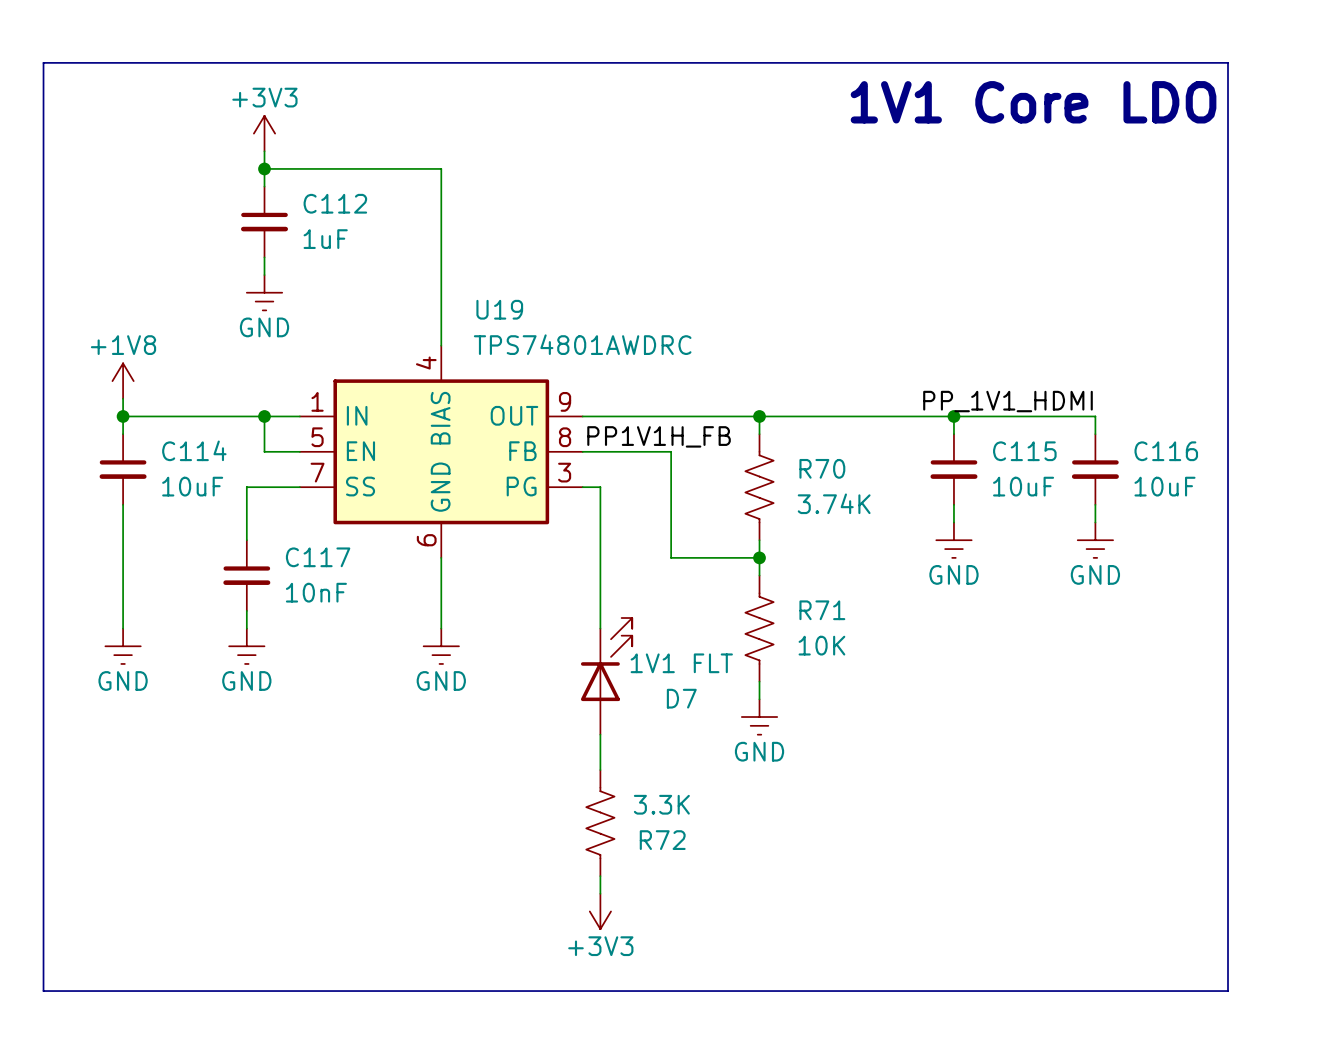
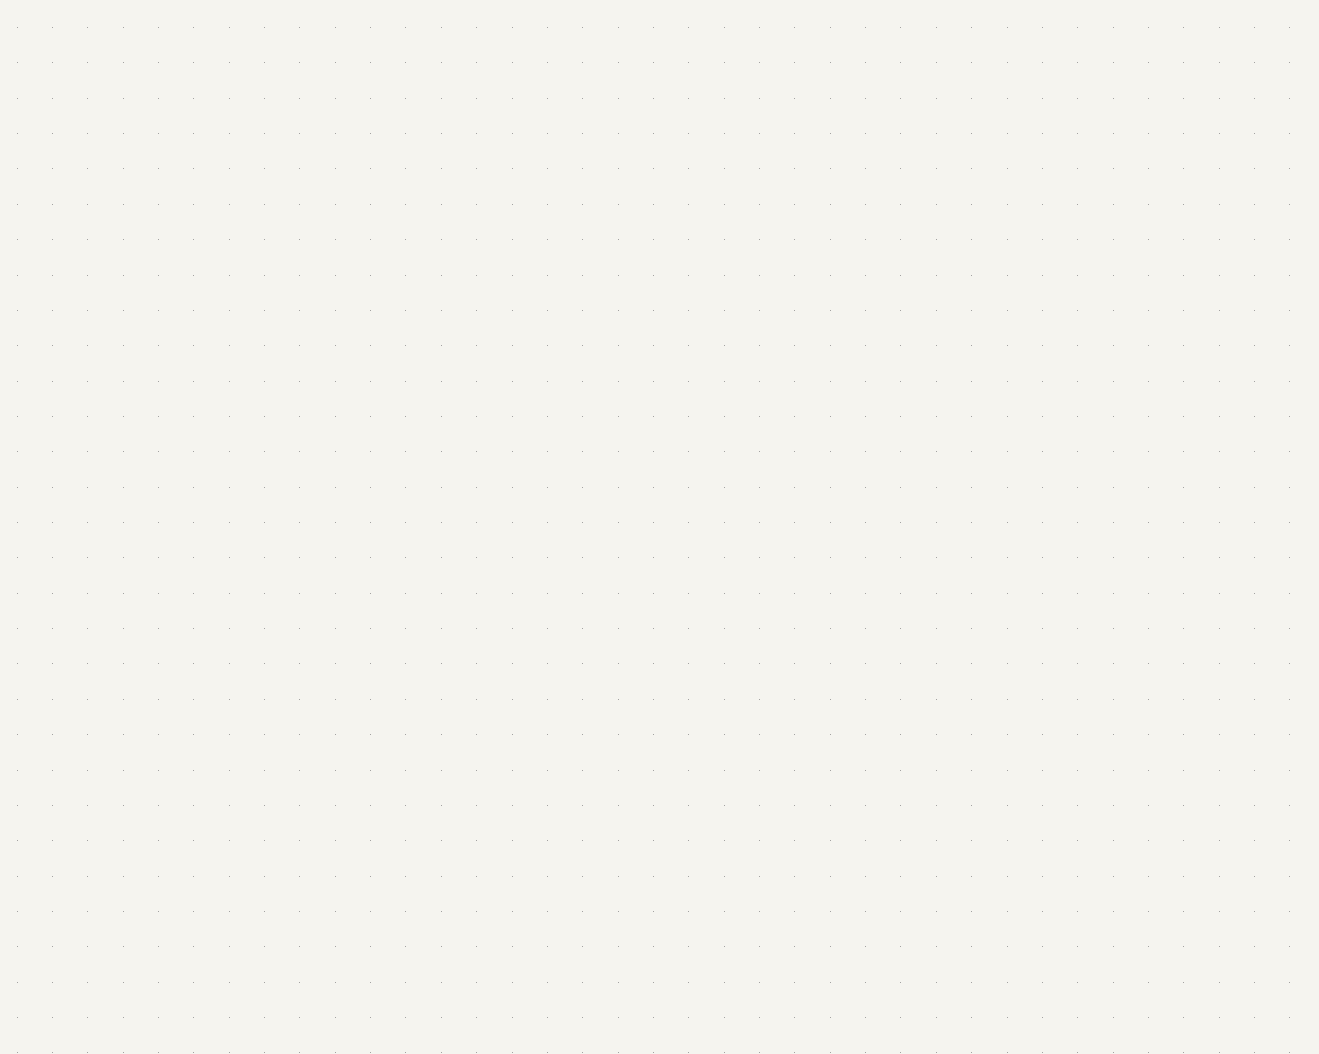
line: (43, 62) (1228, 62) (1228, 991) (43, 991) (43, 62) -> none
text: 1V1 Core LDO (1033, 102) -> none
power symbol: +3V3 (264, 133) -> none
wire: (264, 151) (264, 186) -> none
wire: (264, 168) (441, 168) (441, 345) -> none
junction: (264, 168) -> none
C112: 1uF (264, 222) -> none
wire: (264, 257) (264, 275) -> none
power symbol: GND (264, 292) -> none
power symbol: +1V8 (123, 381) -> none
wire: (123, 398) (123, 434) -> none
label: PP_1V1_HDMI (1007, 401) -> none
wire: (123, 416) (299, 416) -> none
junction: (123, 416) -> none
wire: (264, 416) (264, 451) (299, 451) -> none
junction: (264, 416) -> none
wire: (582, 416) (1095, 416) (1095, 434) -> none
wire: (759, 416) (759, 434) -> none
junction: (759, 416) -> none
wire: (953, 416) (953, 434) -> none
junction: (953, 416) -> none
label: PP1V1H_FB (659, 436) -> none
U19: TPS74801AWDRC (441, 451) -> none
wire: (582, 451) (671, 451) (671, 557) (759, 557) -> none
C114: 10uF (123, 469) -> none
C115: 10uF (953, 469) -> none
C116: 10uF (1095, 469) -> none
wire: (299, 487) (246, 487) (246, 540) -> none
wire: (582, 487) (600, 487) (600, 628) -> none
R70: 3.74K (759, 487) -> none
wire: (123, 504) (123, 628) -> none
wire: (953, 504) (953, 522) -> none
wire: (1095, 504) (1095, 522) -> none
wire: (759, 540) (759, 575) -> none
power symbol: GND (953, 540) -> none
power symbol: GND (1095, 540) -> none
wire: (441, 557) (441, 628) -> none
junction: (759, 557) -> none
C117: 10nF (246, 575) -> none
wire: (246, 610) (246, 628) -> none
R71: 10K (759, 628) -> none
power symbol: GND (123, 646) -> none
power symbol: GND (246, 646) -> none
power symbol: GND (441, 646) -> none
D7: 1V1 FLT (606, 676) -> none
wire: (759, 681) (759, 699) -> none
power symbol: GND (759, 717) -> none
wire: (600, 734) (600, 770) -> none
R72: 3.3K (600, 823) -> none
wire: (600, 876) (600, 893) -> none
power symbol: +3V3 (600, 911) -> none

